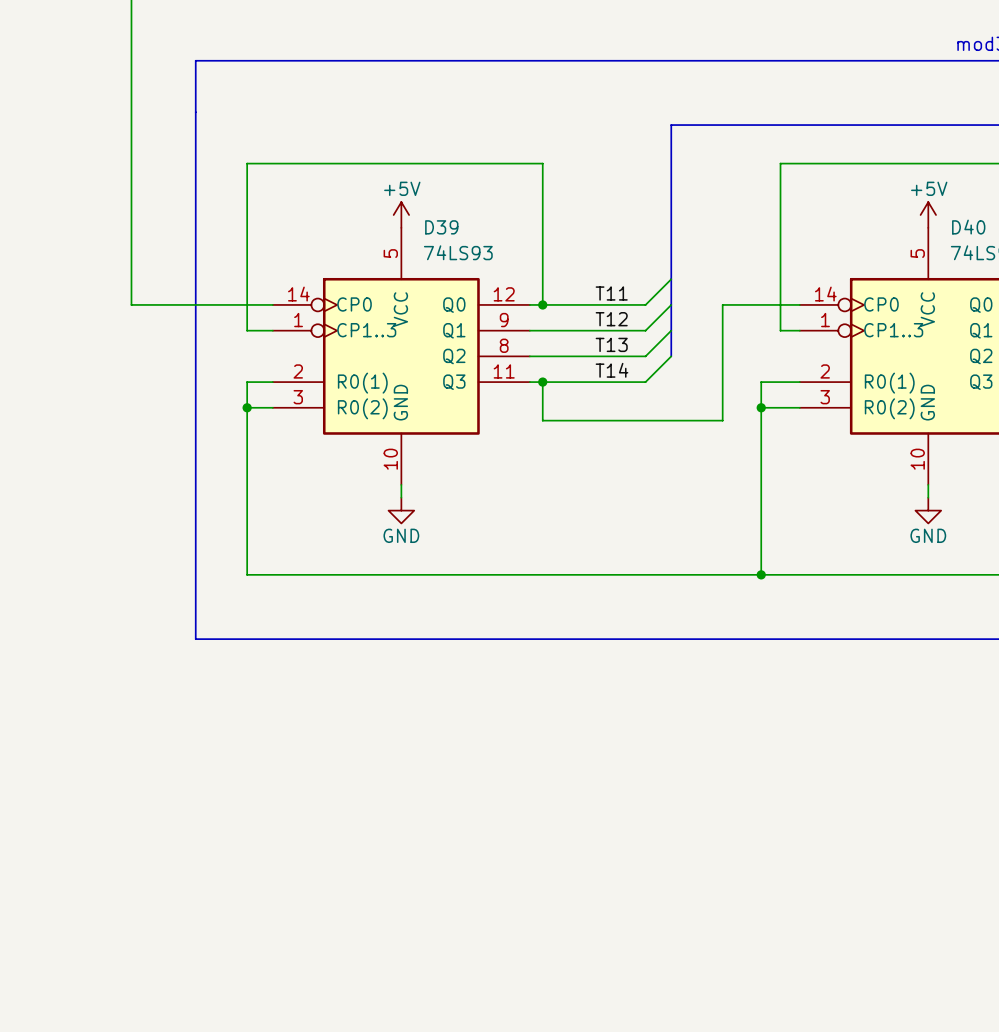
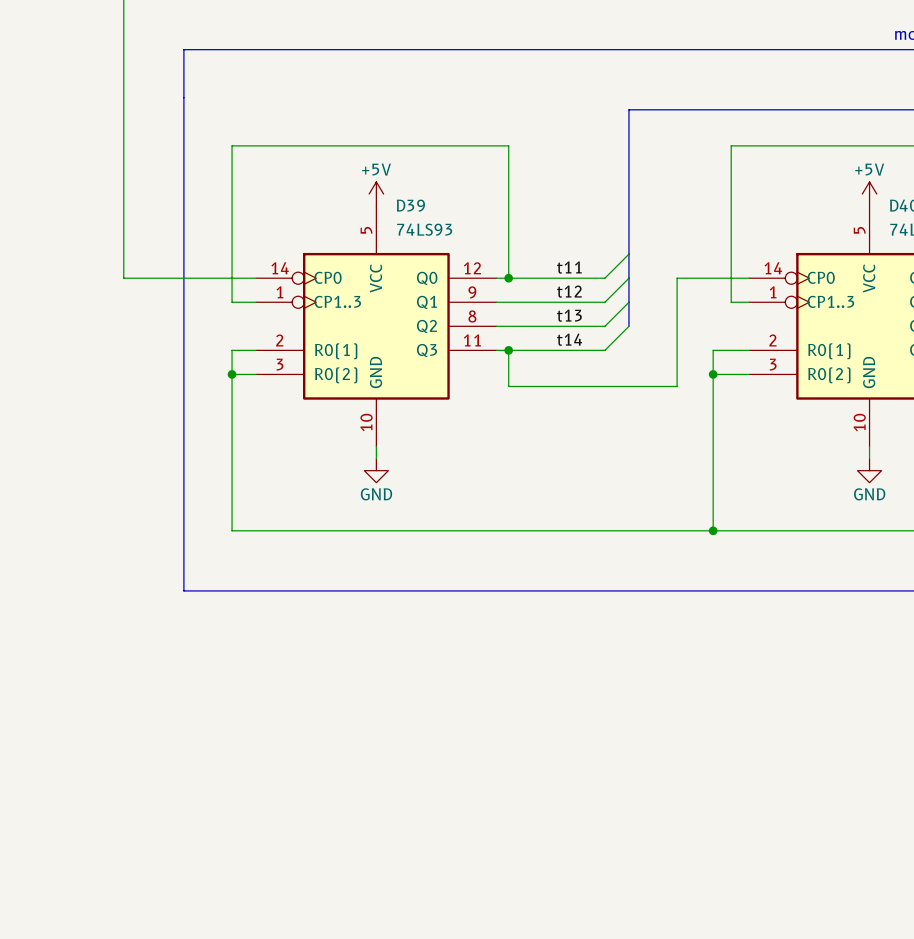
label: T11 (611, 293) -> t11 (569, 267)
label: T12 (611, 319) -> t12 (569, 291)
label: T13 (611, 344) -> t13 (569, 315)
label: T14 (612, 370) -> t14 (569, 339)

